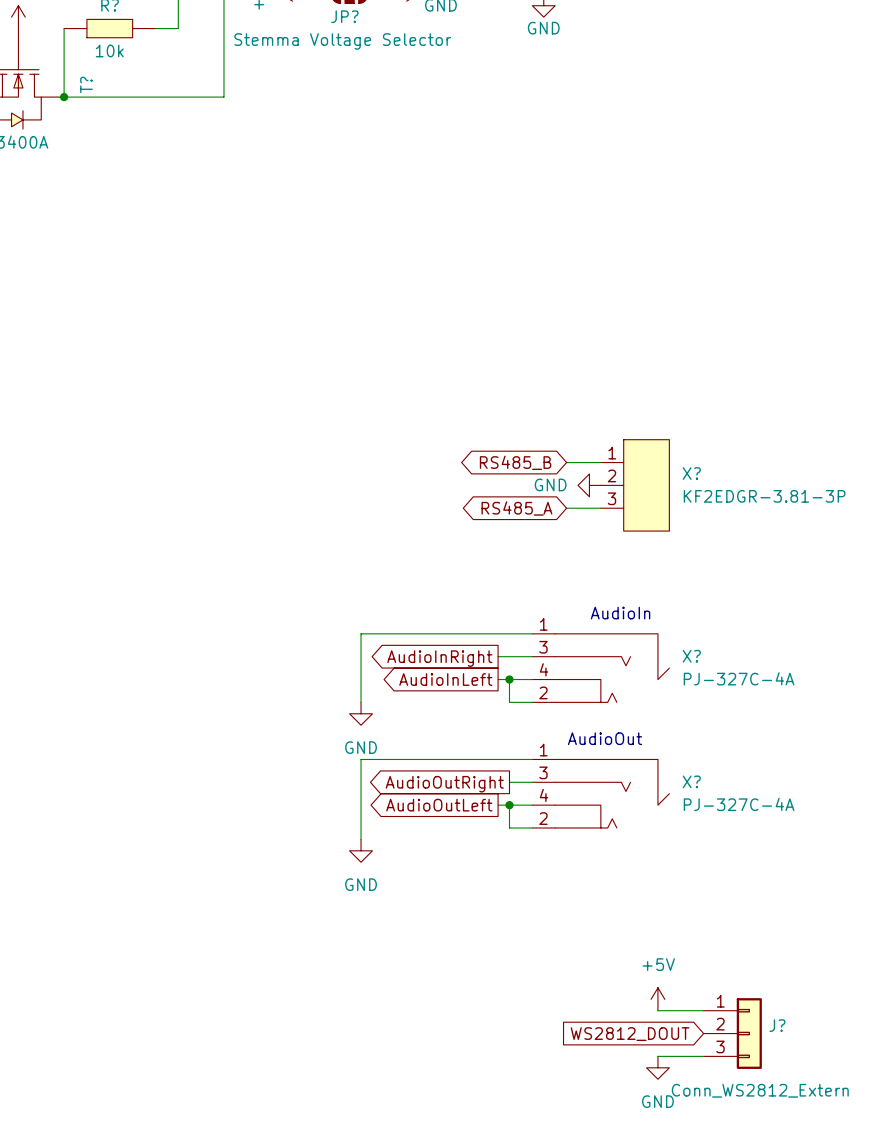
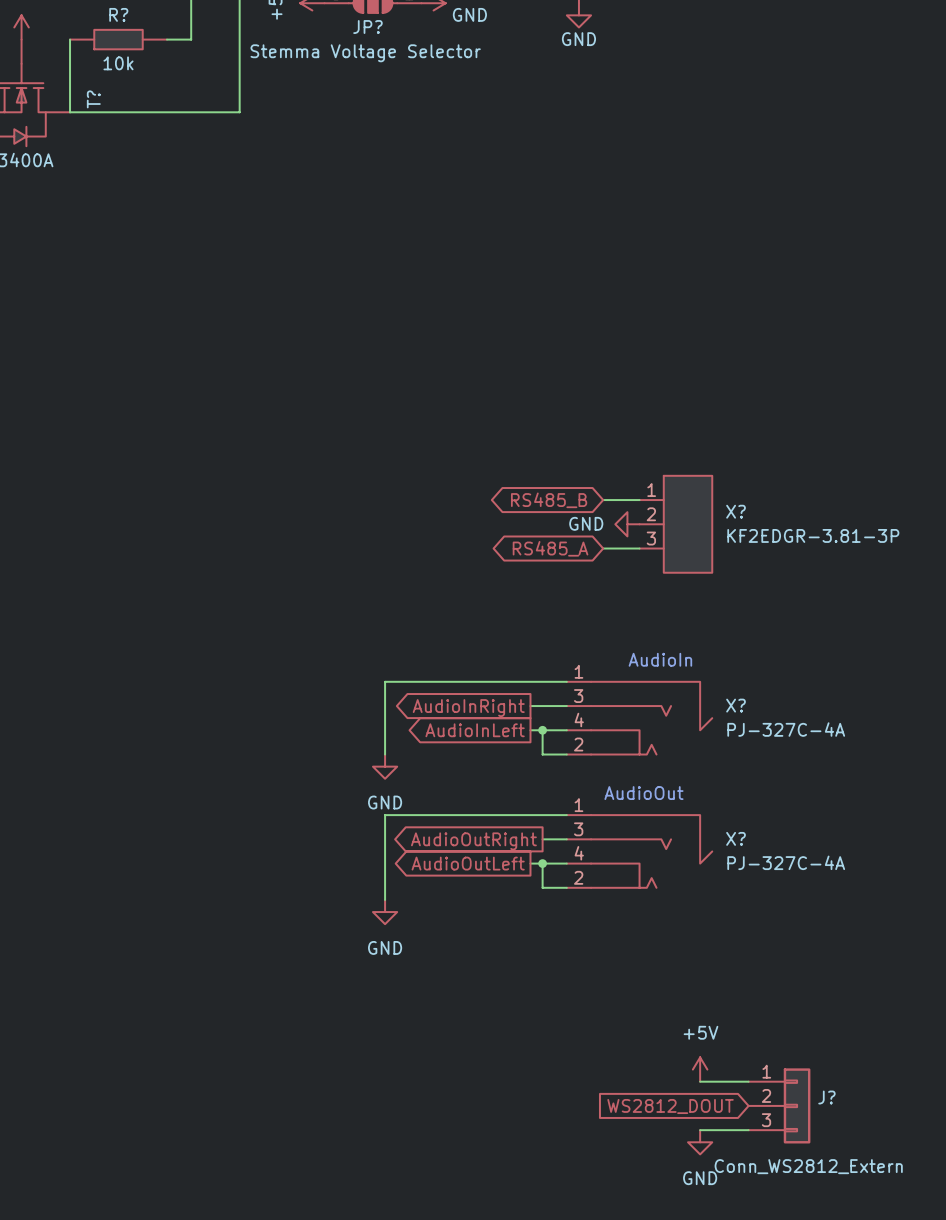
junction: (64, 97) -> none

